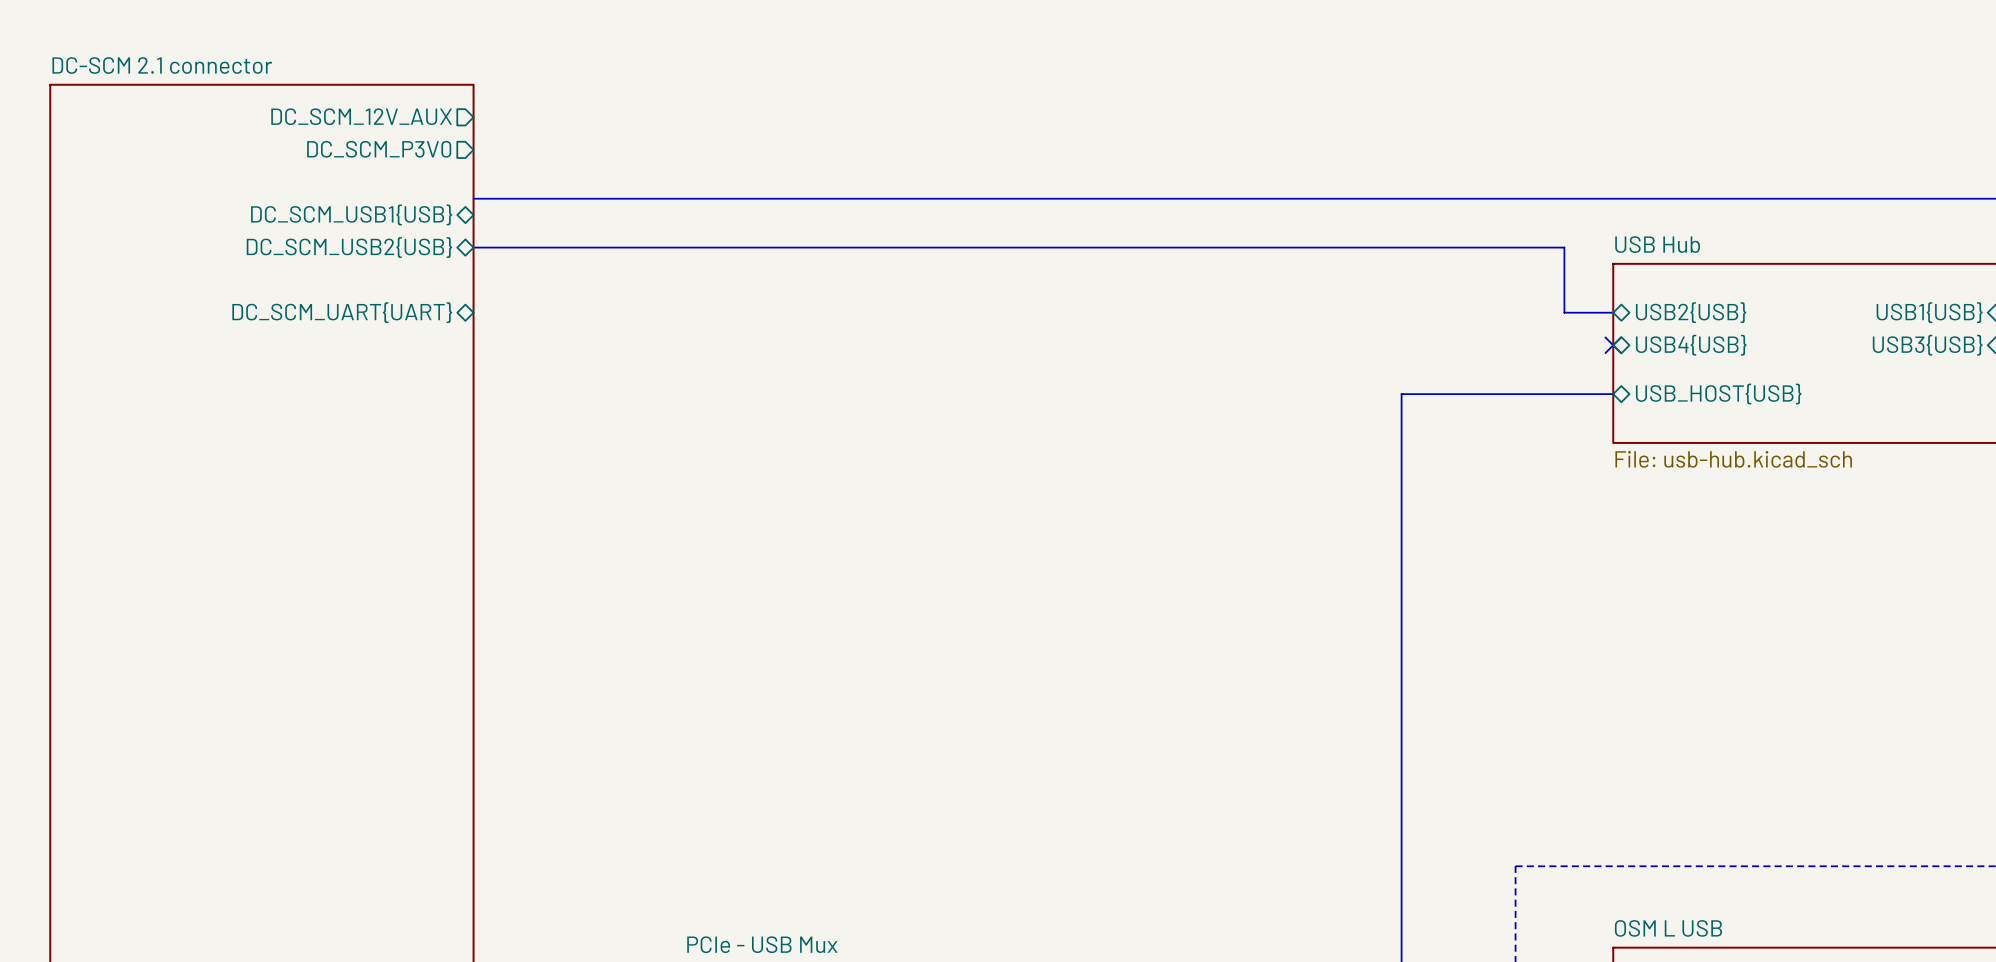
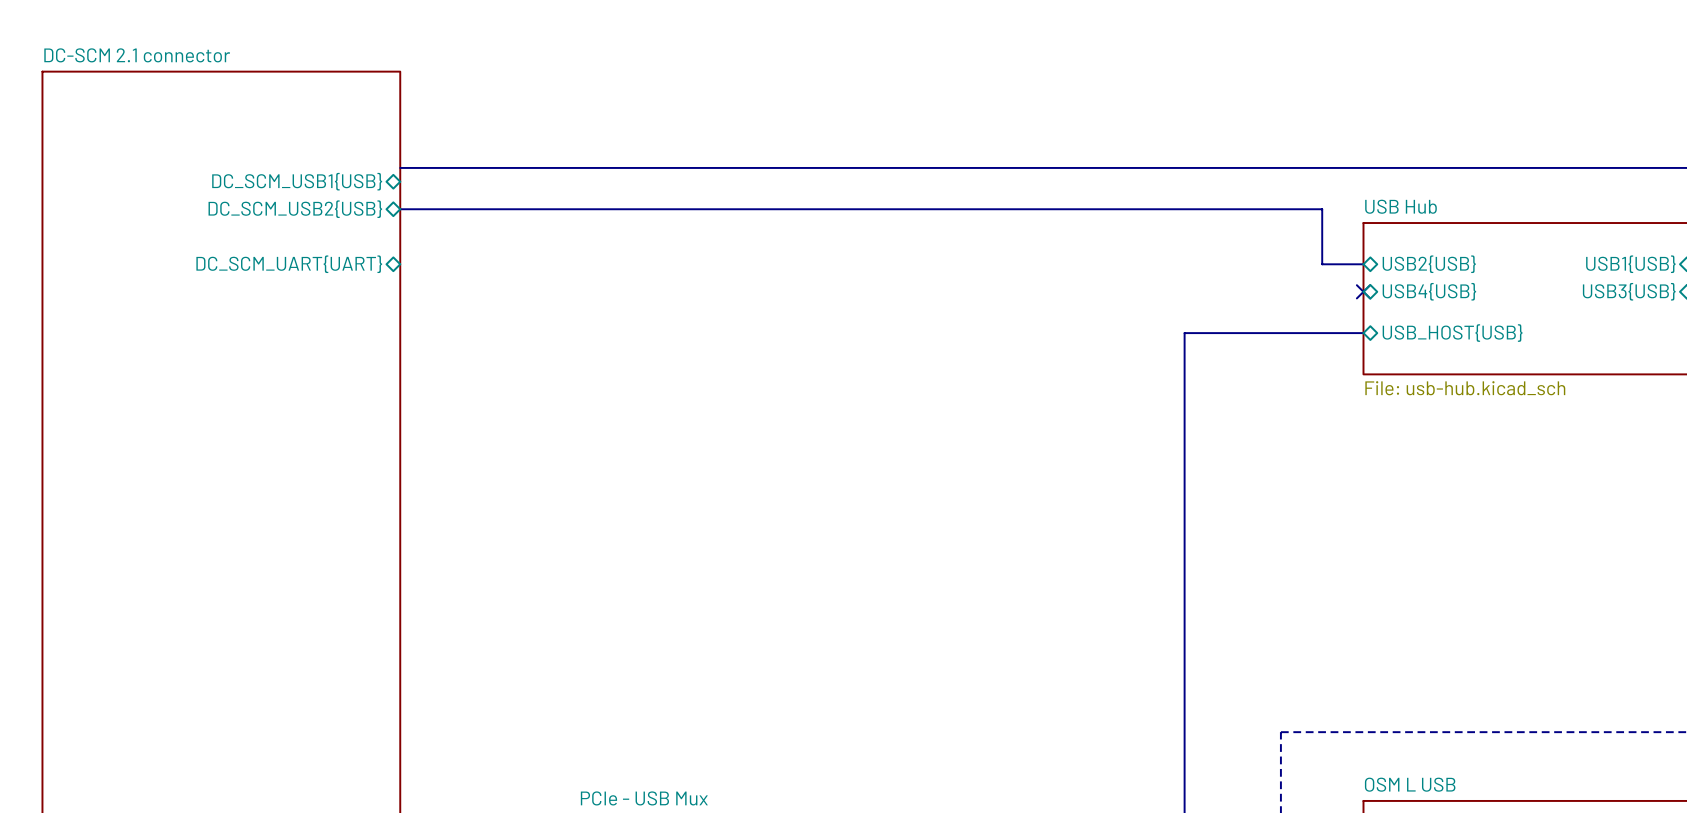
sheet pin: DC_SCM_12V_AUX (361, 116) -> none
sheet pin: DC_SCM_P3V0 (379, 149) -> none

